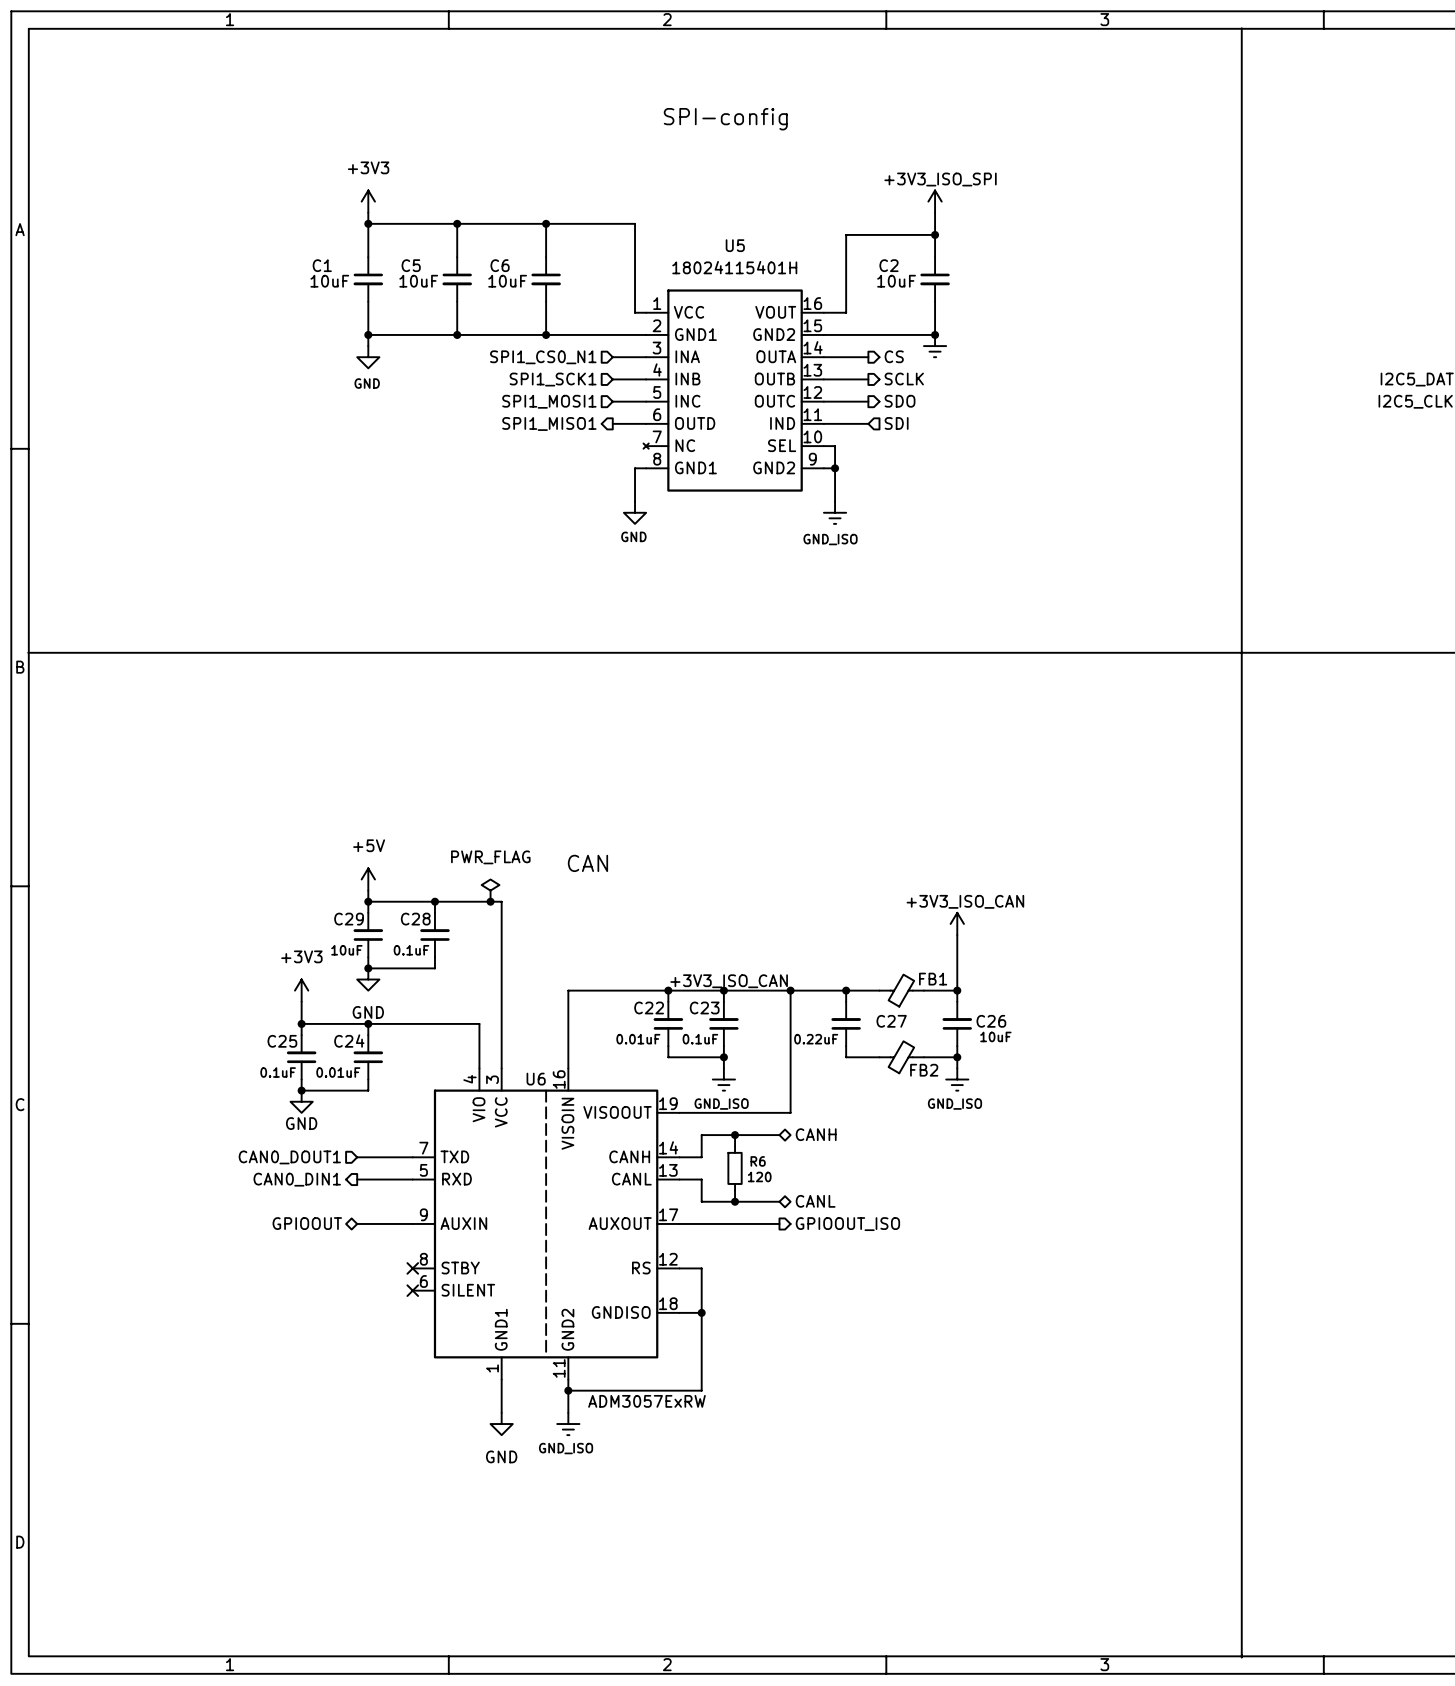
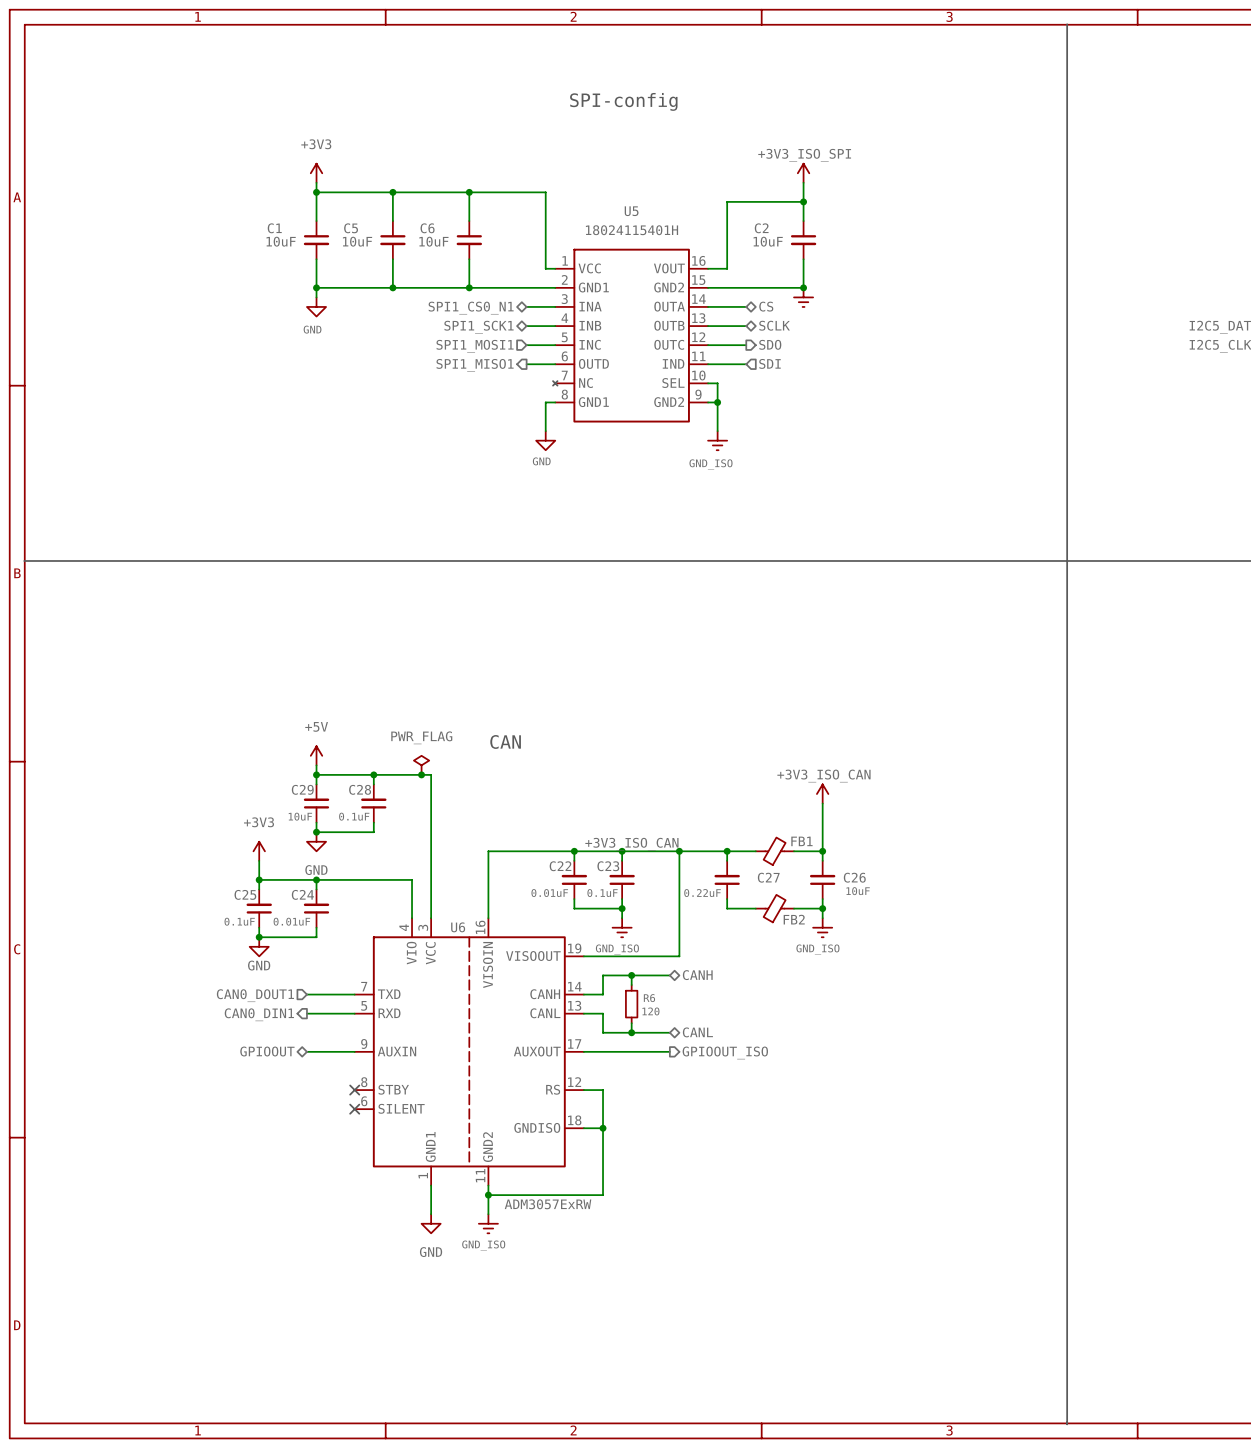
hierarchical label shape: output (894, 356) -> bidirectional (766, 306)
hierarchical label shape: input (543, 357) -> bidirectional (471, 308)
hierarchical label shape: input (553, 379) -> bidirectional (479, 327)
hierarchical label shape: output (904, 379) -> bidirectional (774, 325)

